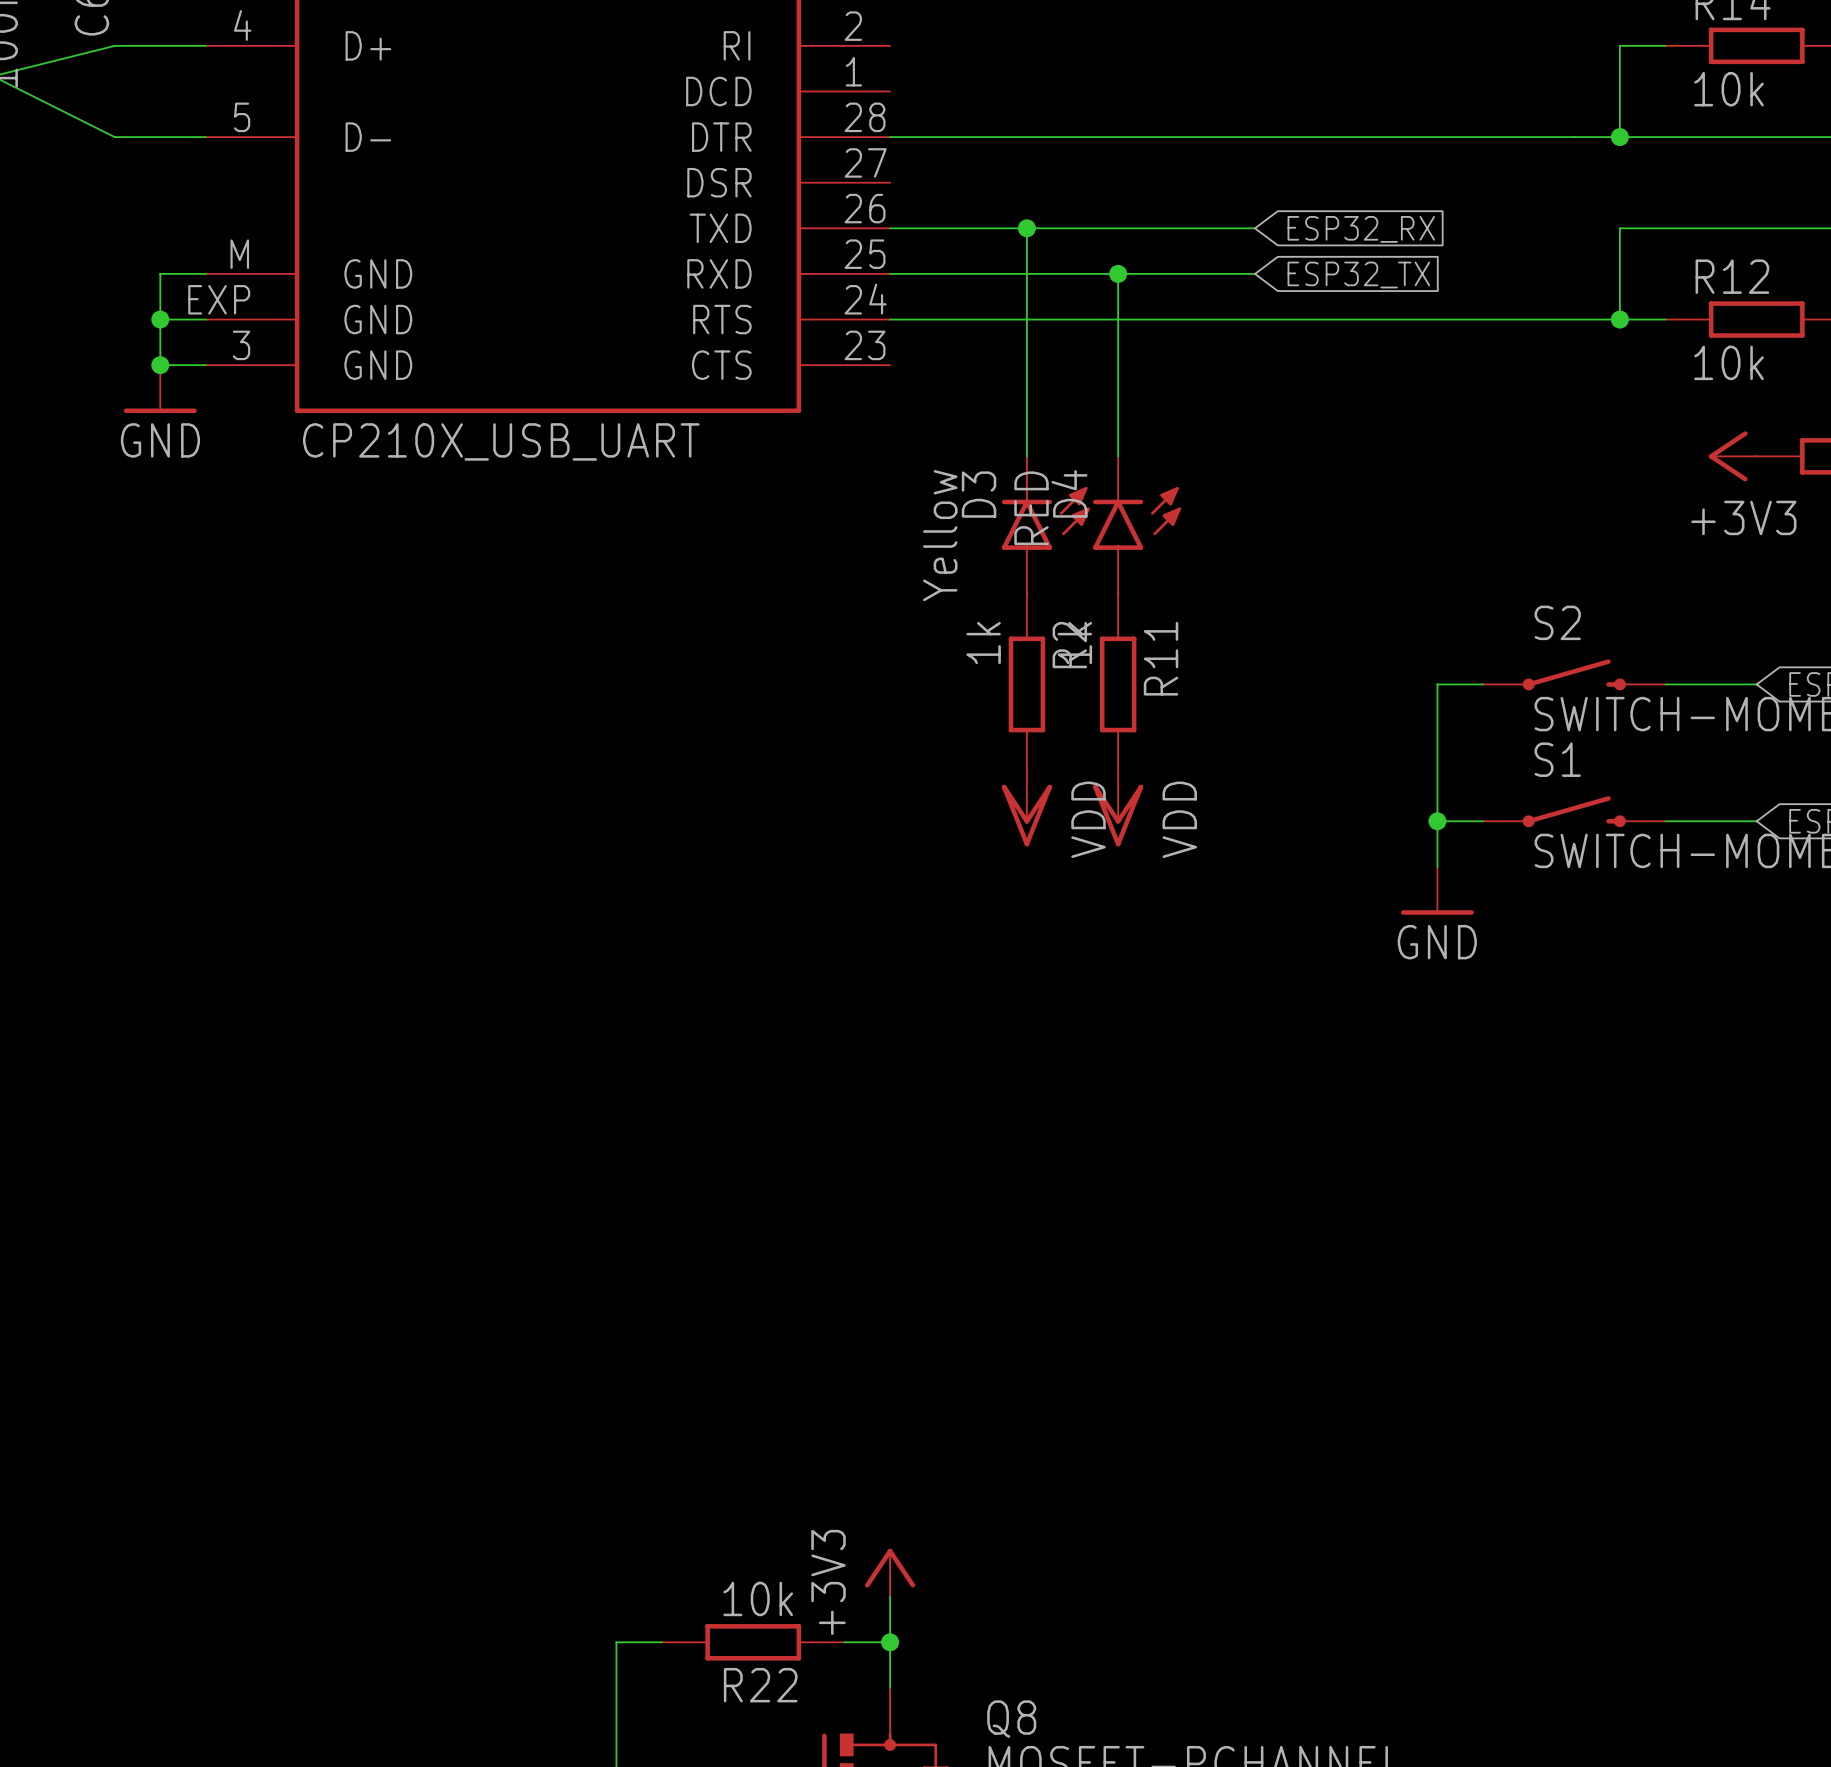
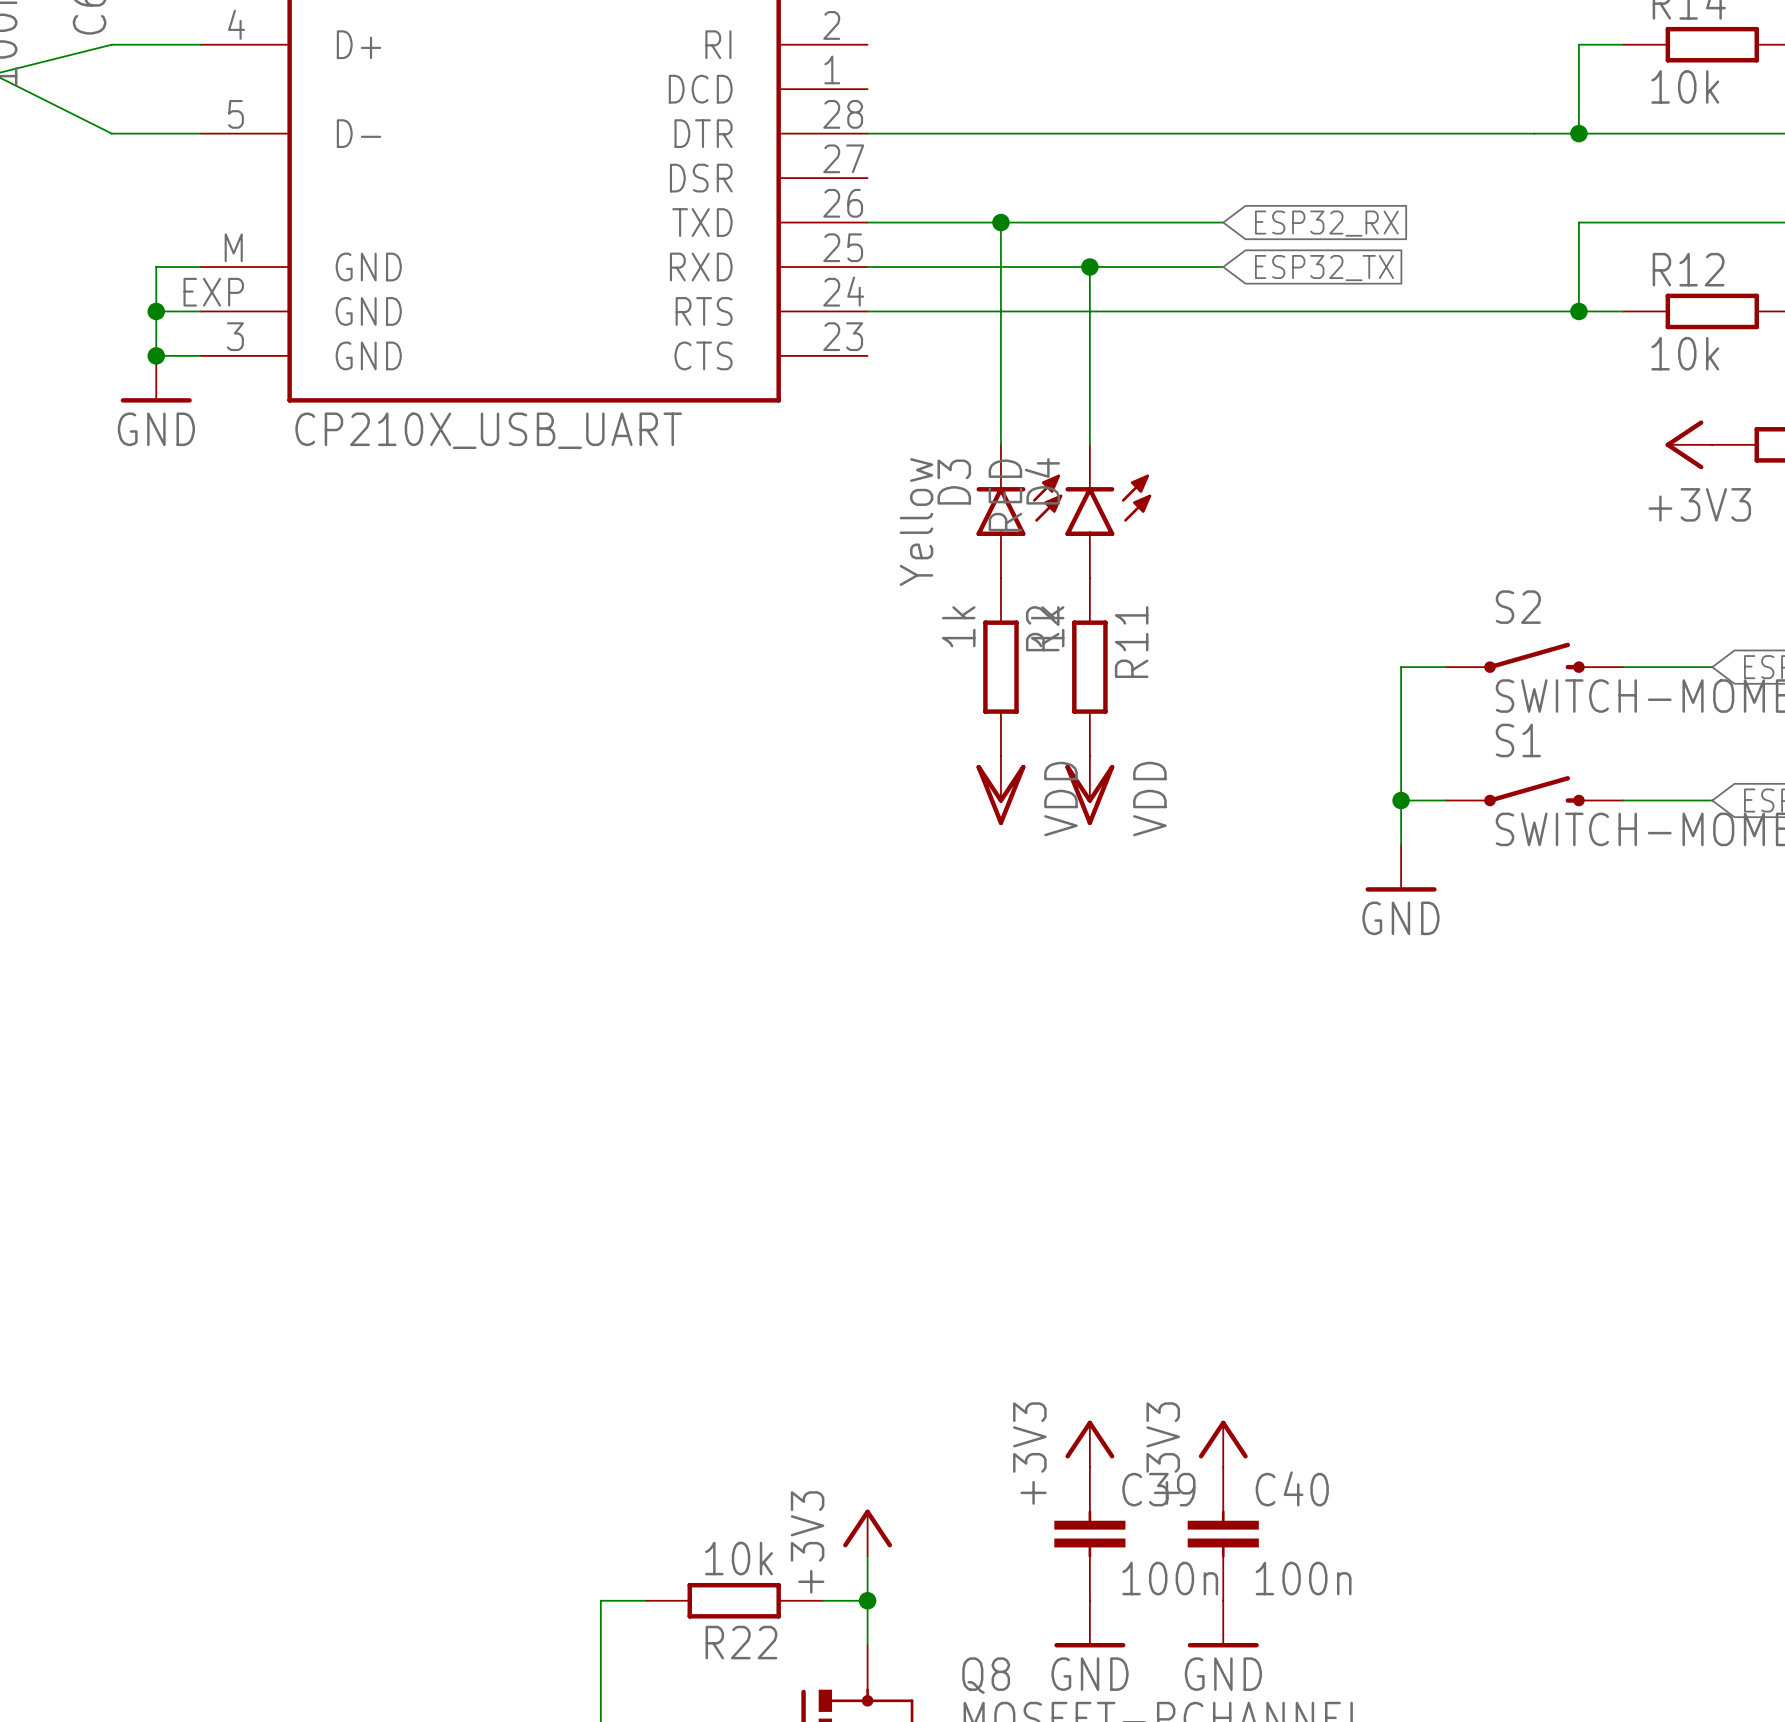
power symbol: none -> +3V3 (1089, 1444)
power symbol: none -> +3V3 (1223, 1444)
C39: none -> 100n (1089, 1534)
C40: none -> 100n (1223, 1534)
power symbol: none -> GND (1089, 1624)
power symbol: none -> GND (1223, 1624)

